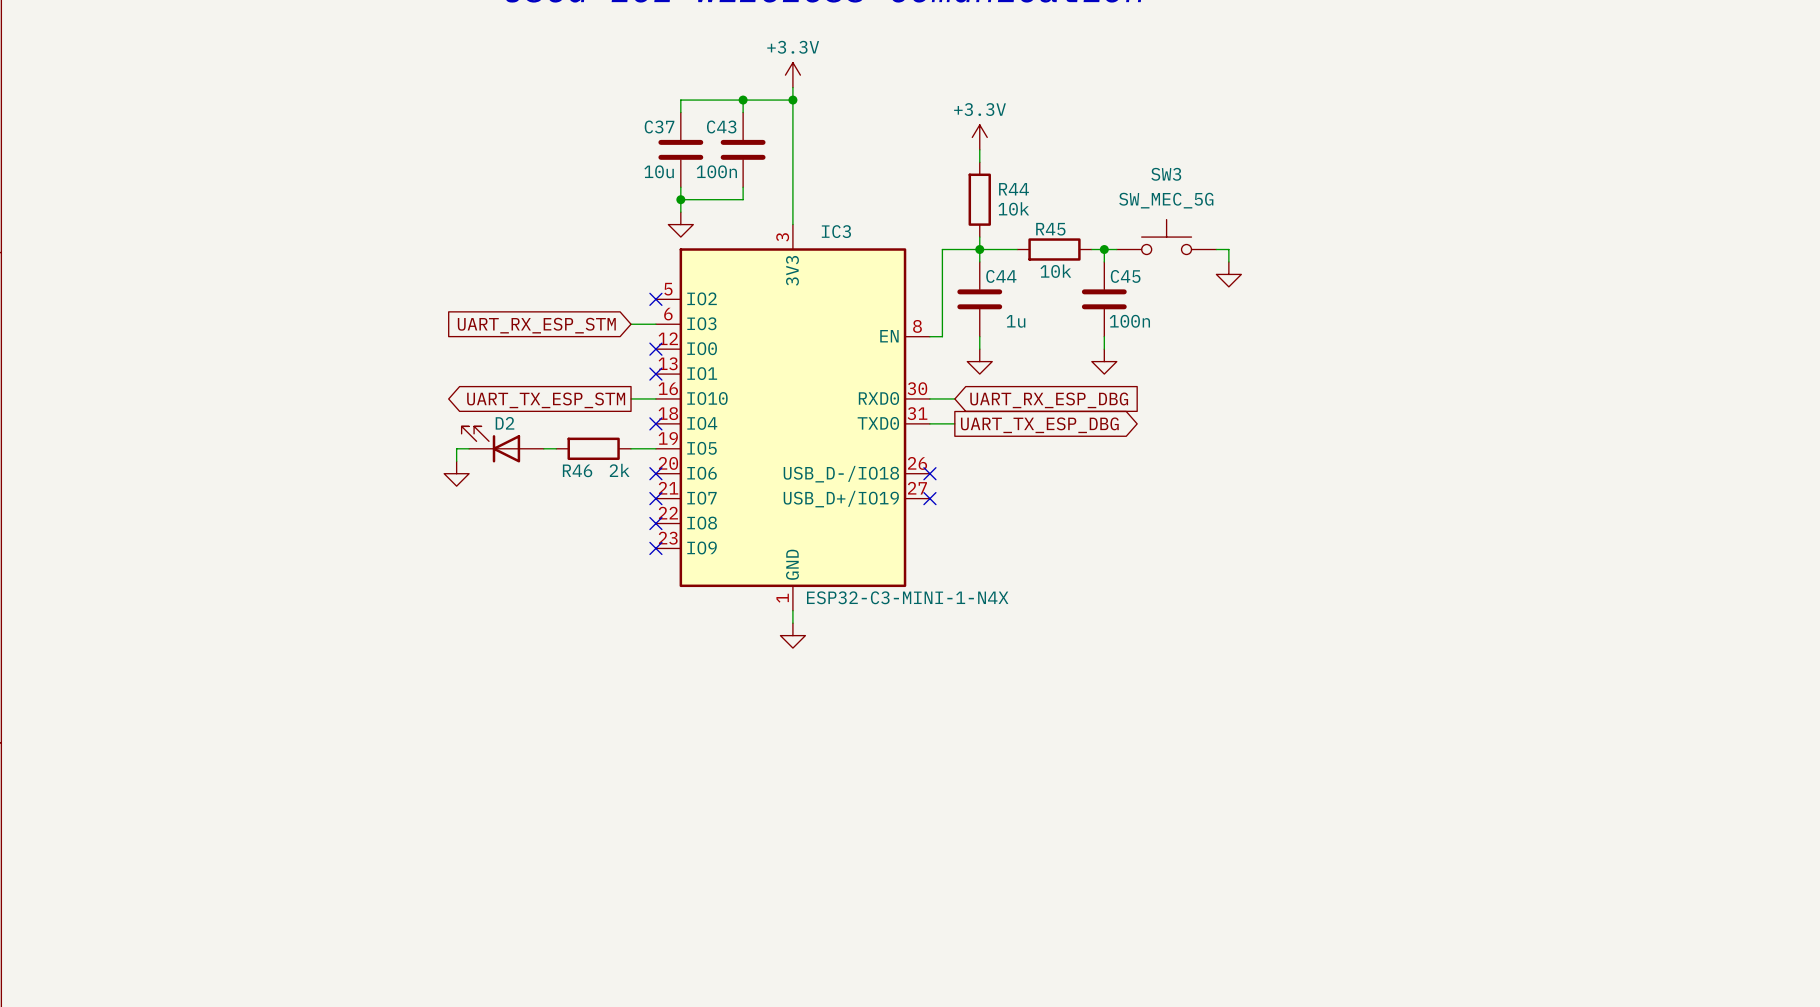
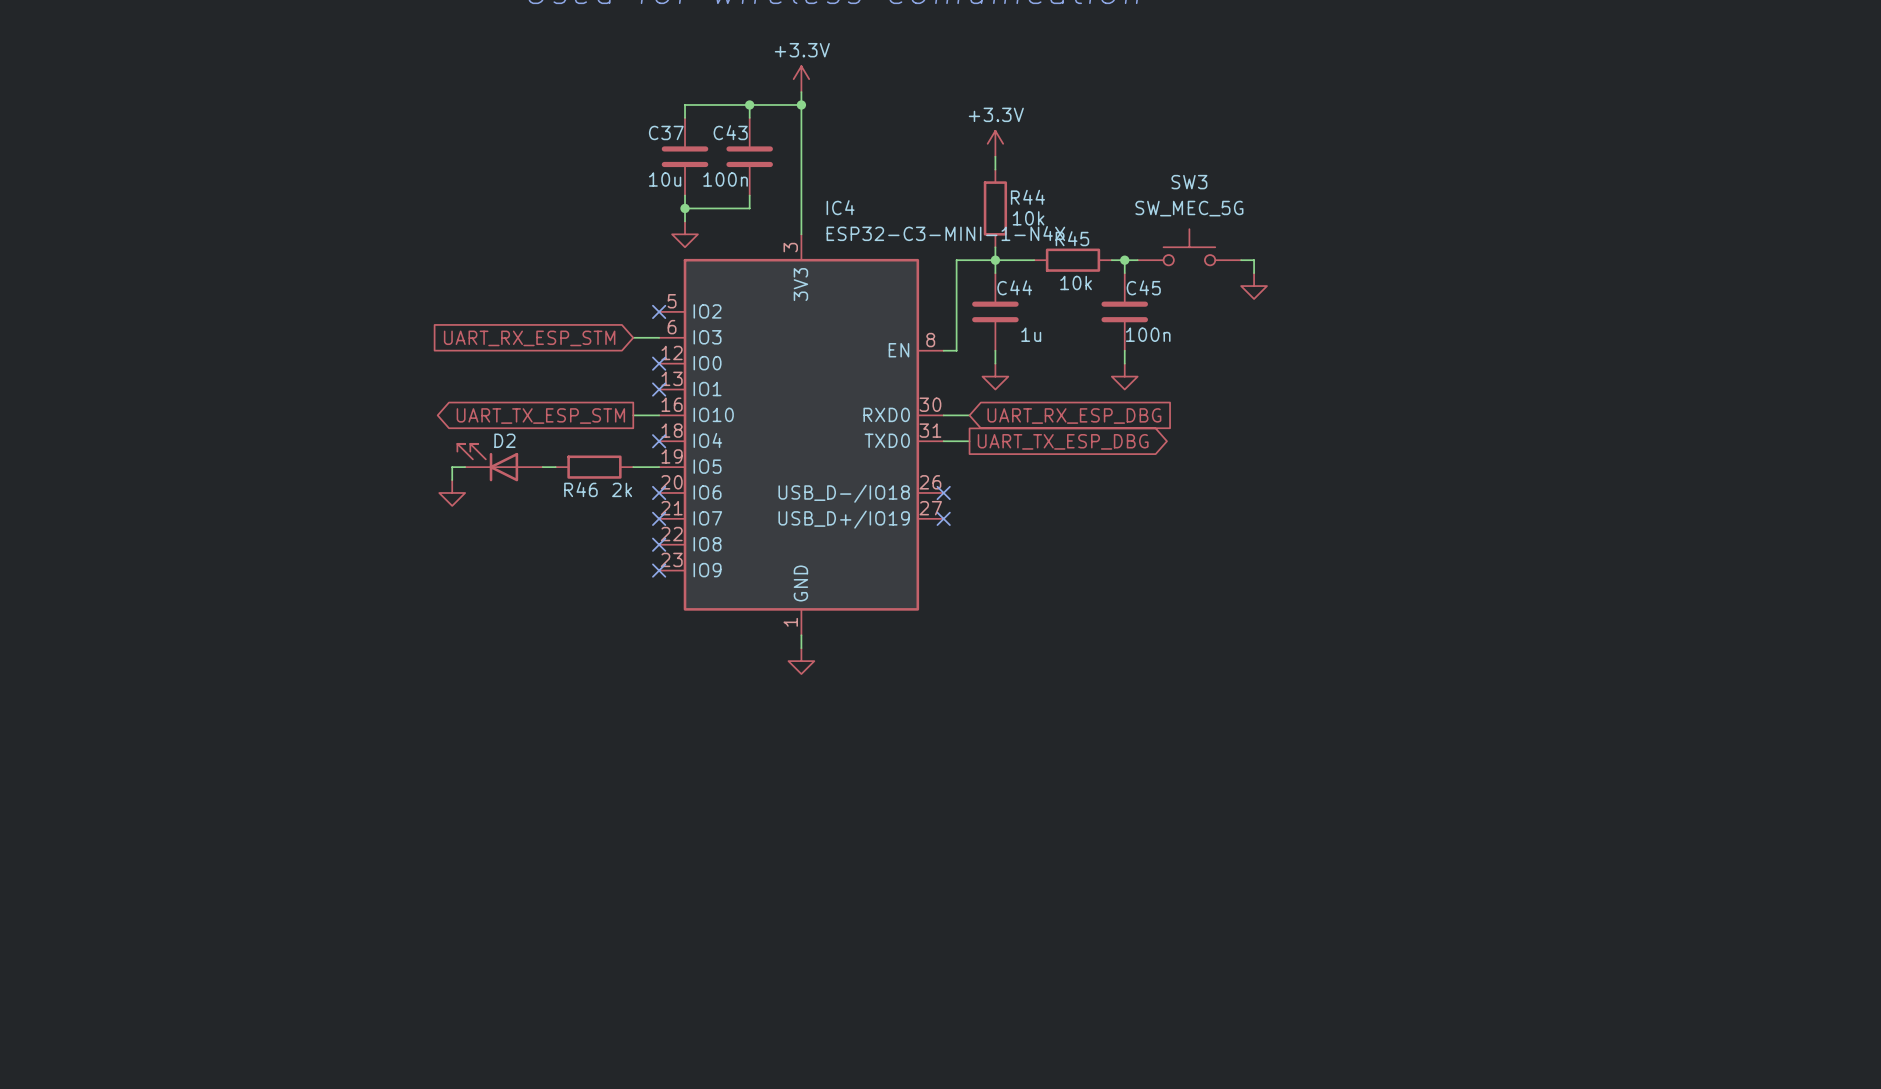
IC3 name: IC3 (836, 231) -> IC4 (840, 207)
IC3 value position: ESP32-C3-MINI-1-N4X (907, 597) -> ESP32-C3-MINI-1-N4X (945, 233)

